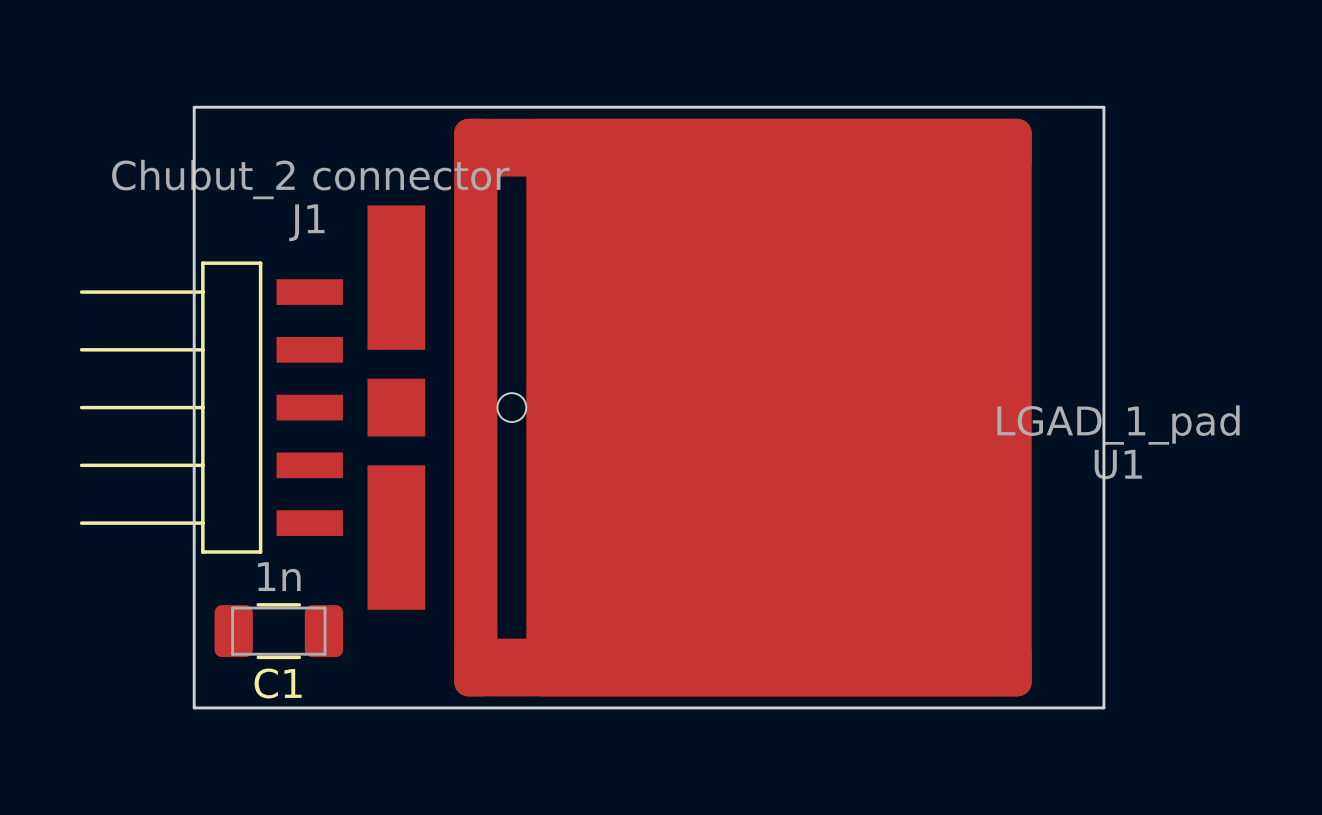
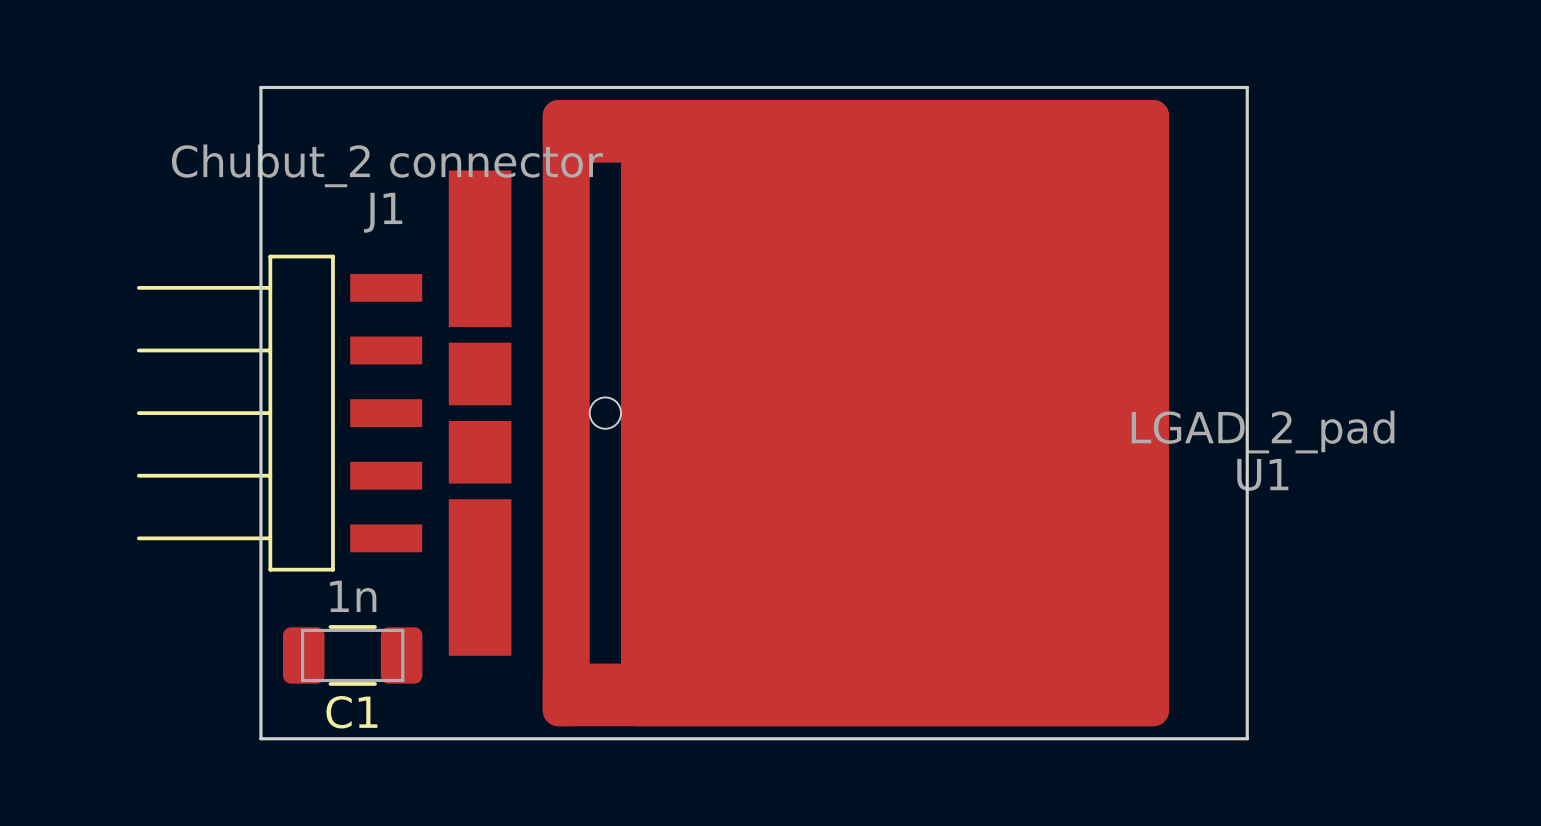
U1 footprint: [367, 118, 1032, 697] -> [448, 100, 1169, 727]
U1 value: LGAD_1_pad (1118, 425) -> LGAD_2_pad (1263, 432)

